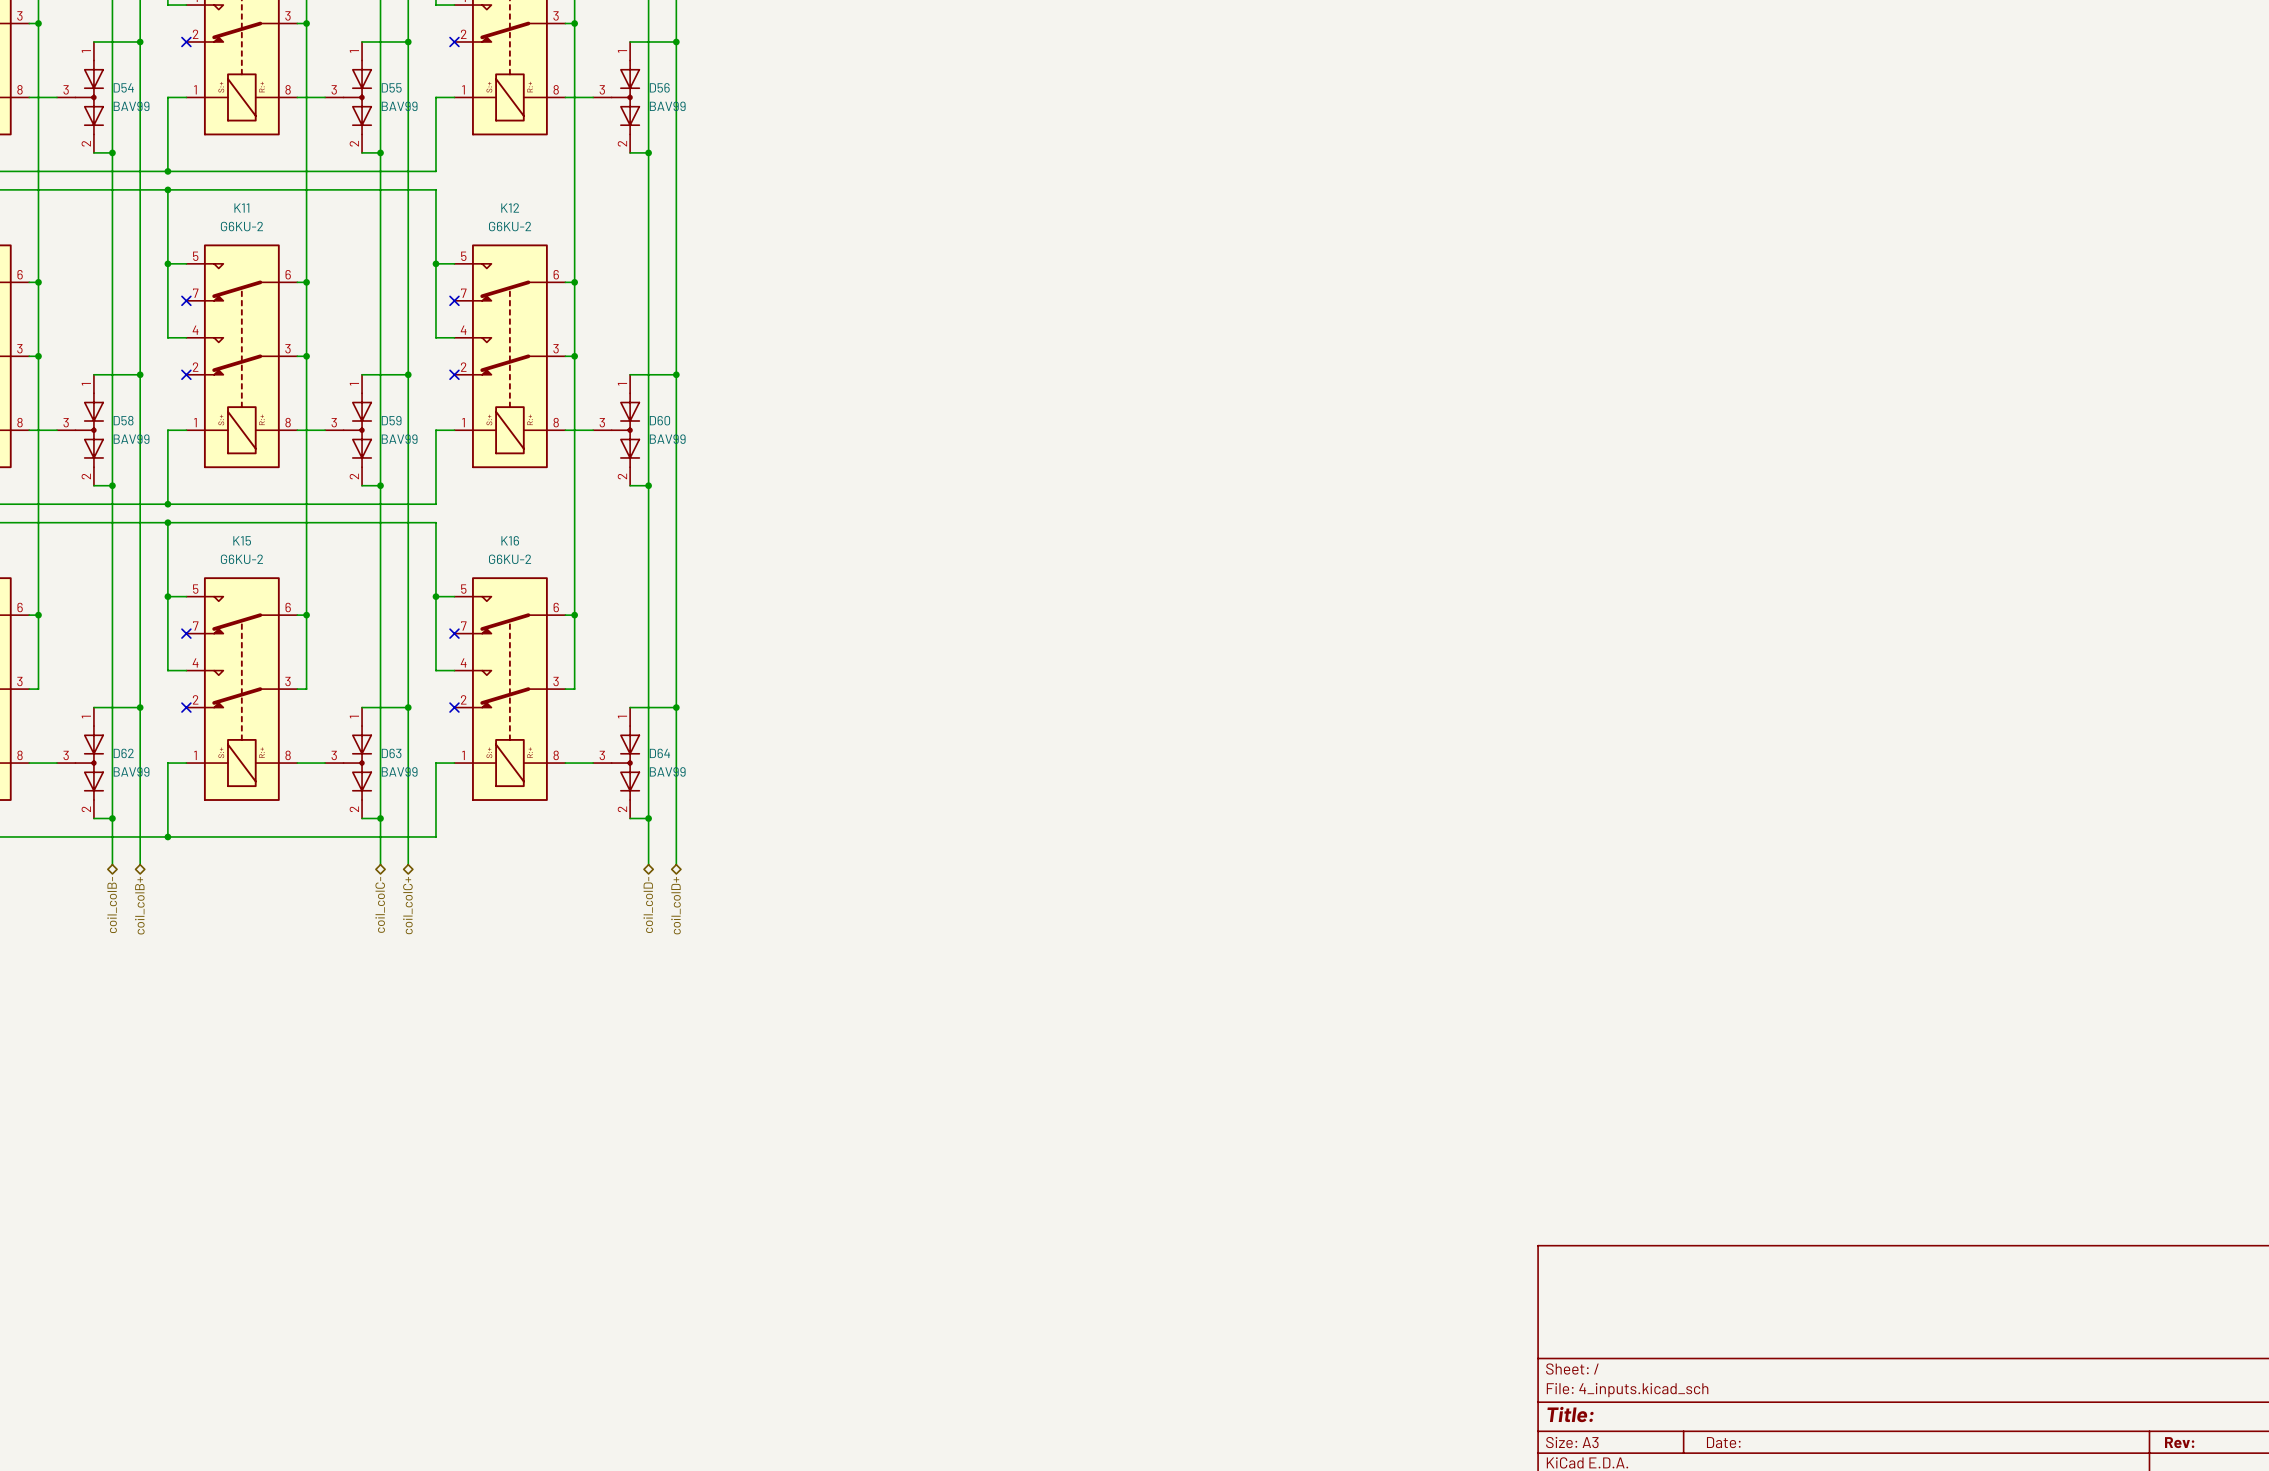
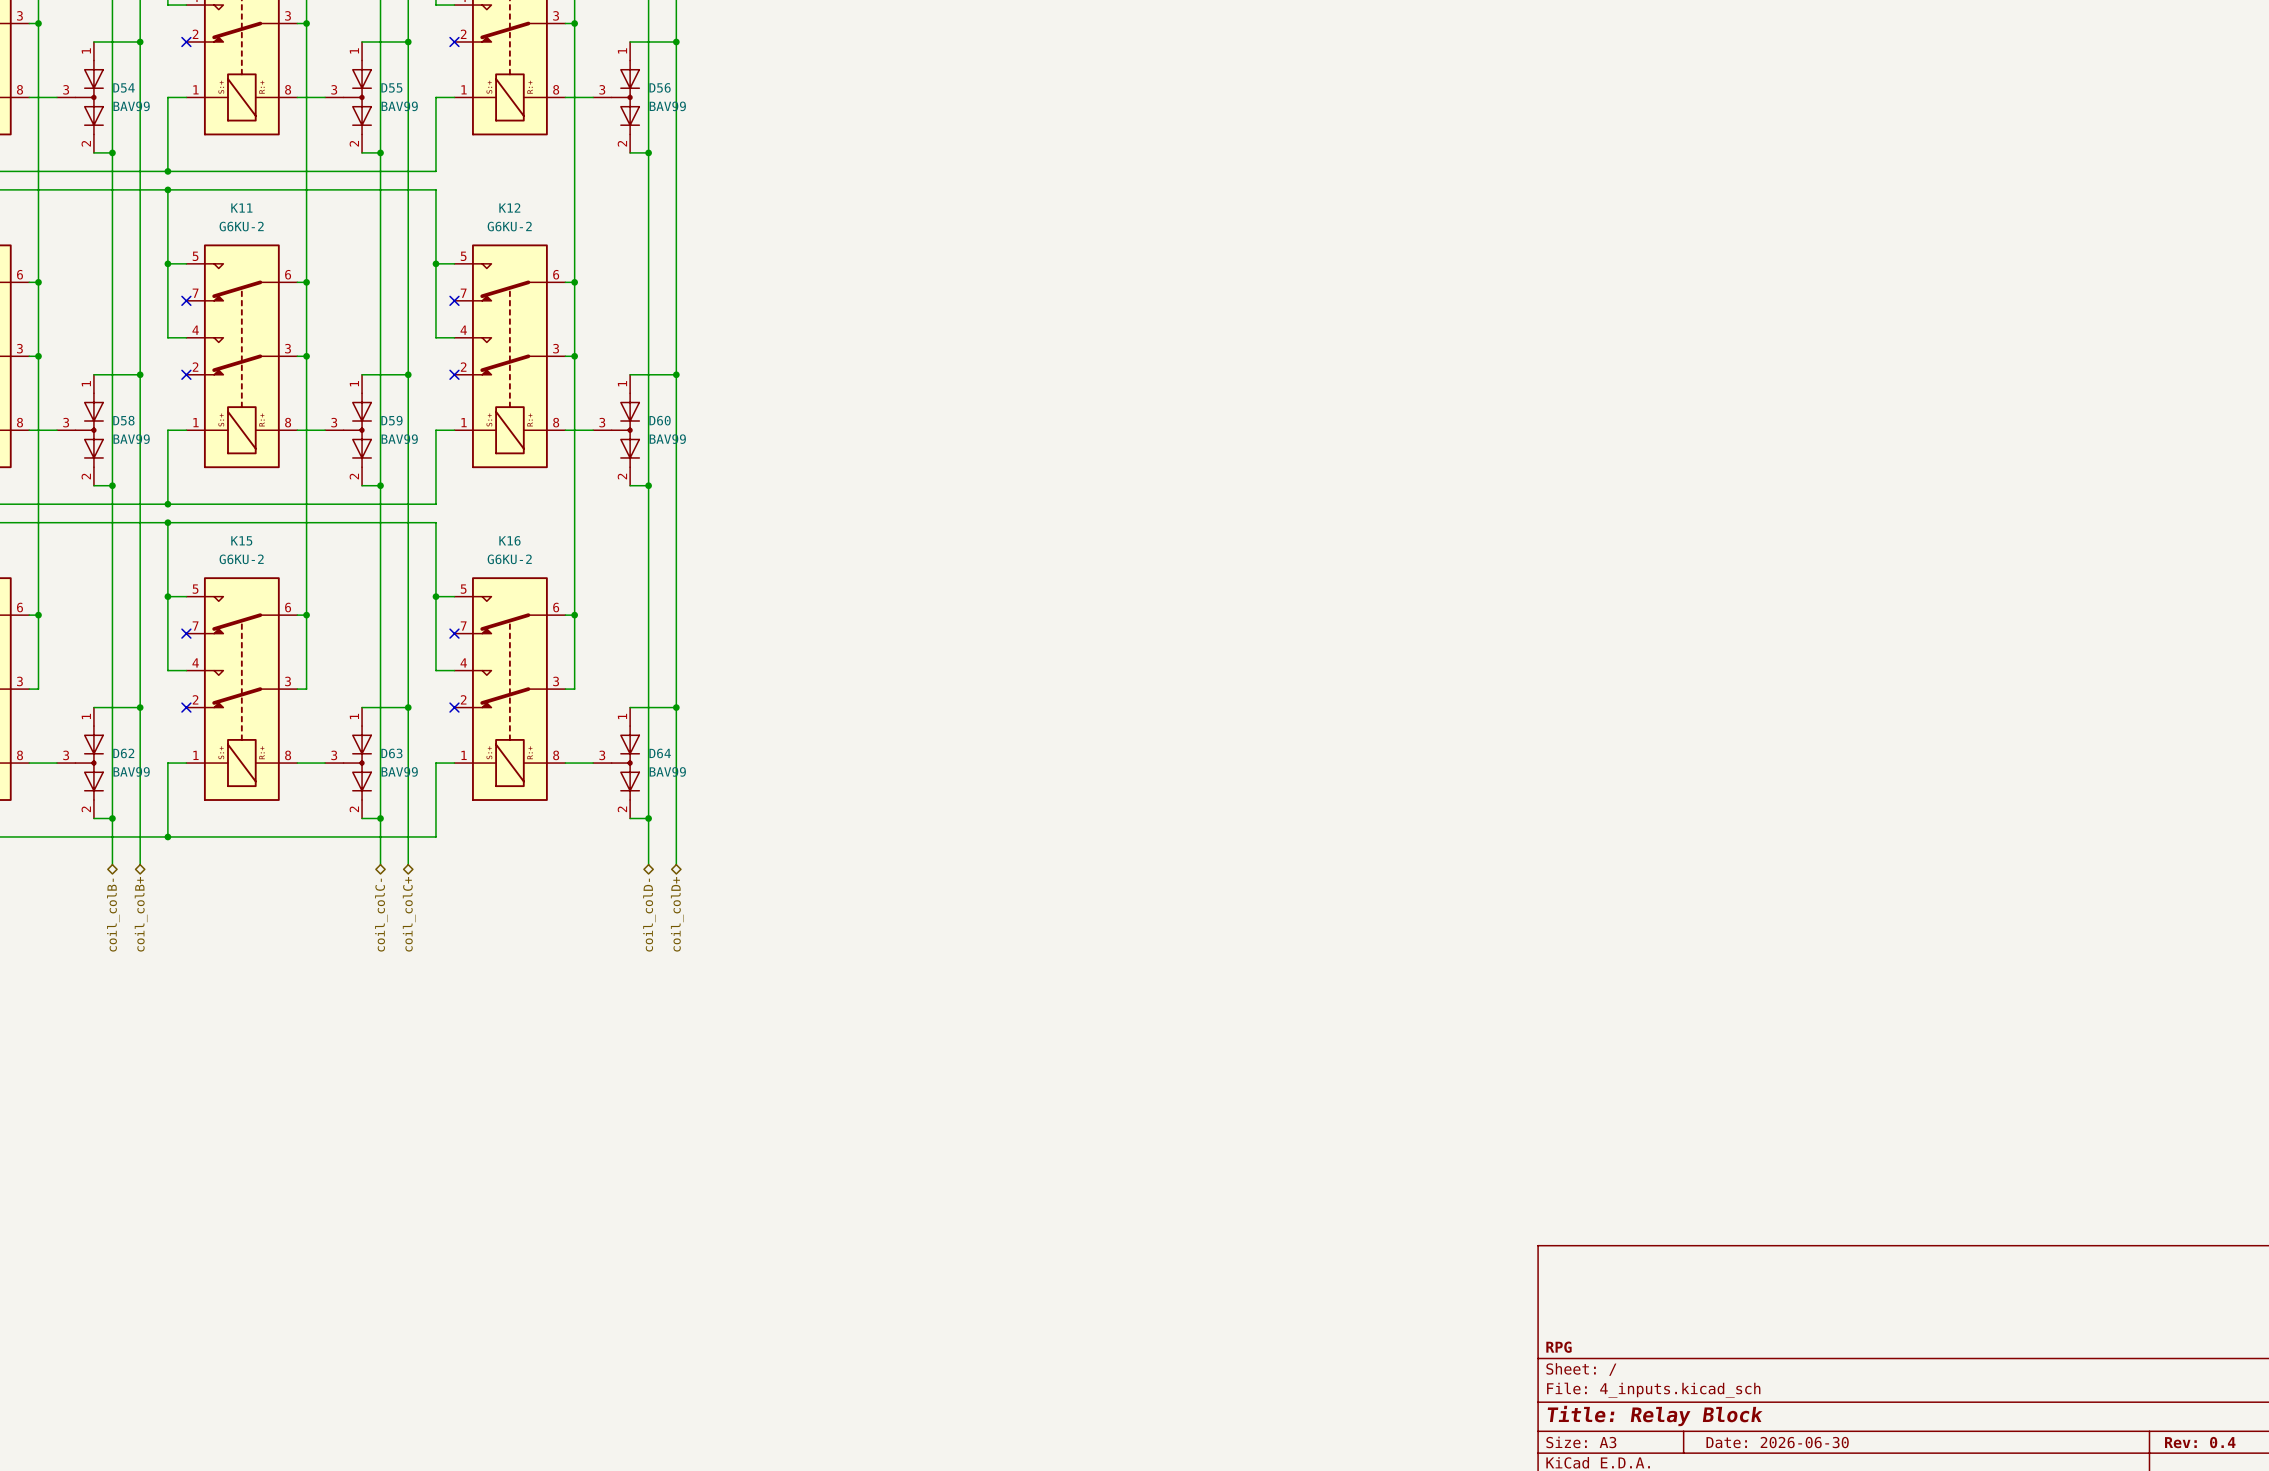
title block: none -> RPG (1558, 1347)
title block: Title: (1570, 1414) -> Title: Relay Block (1655, 1415)
title block: Date: (1723, 1442) -> Date: 2026-06-30 (1777, 1442)
title block: Rev: (2179, 1442) -> Rev: 0.4 (2200, 1442)

